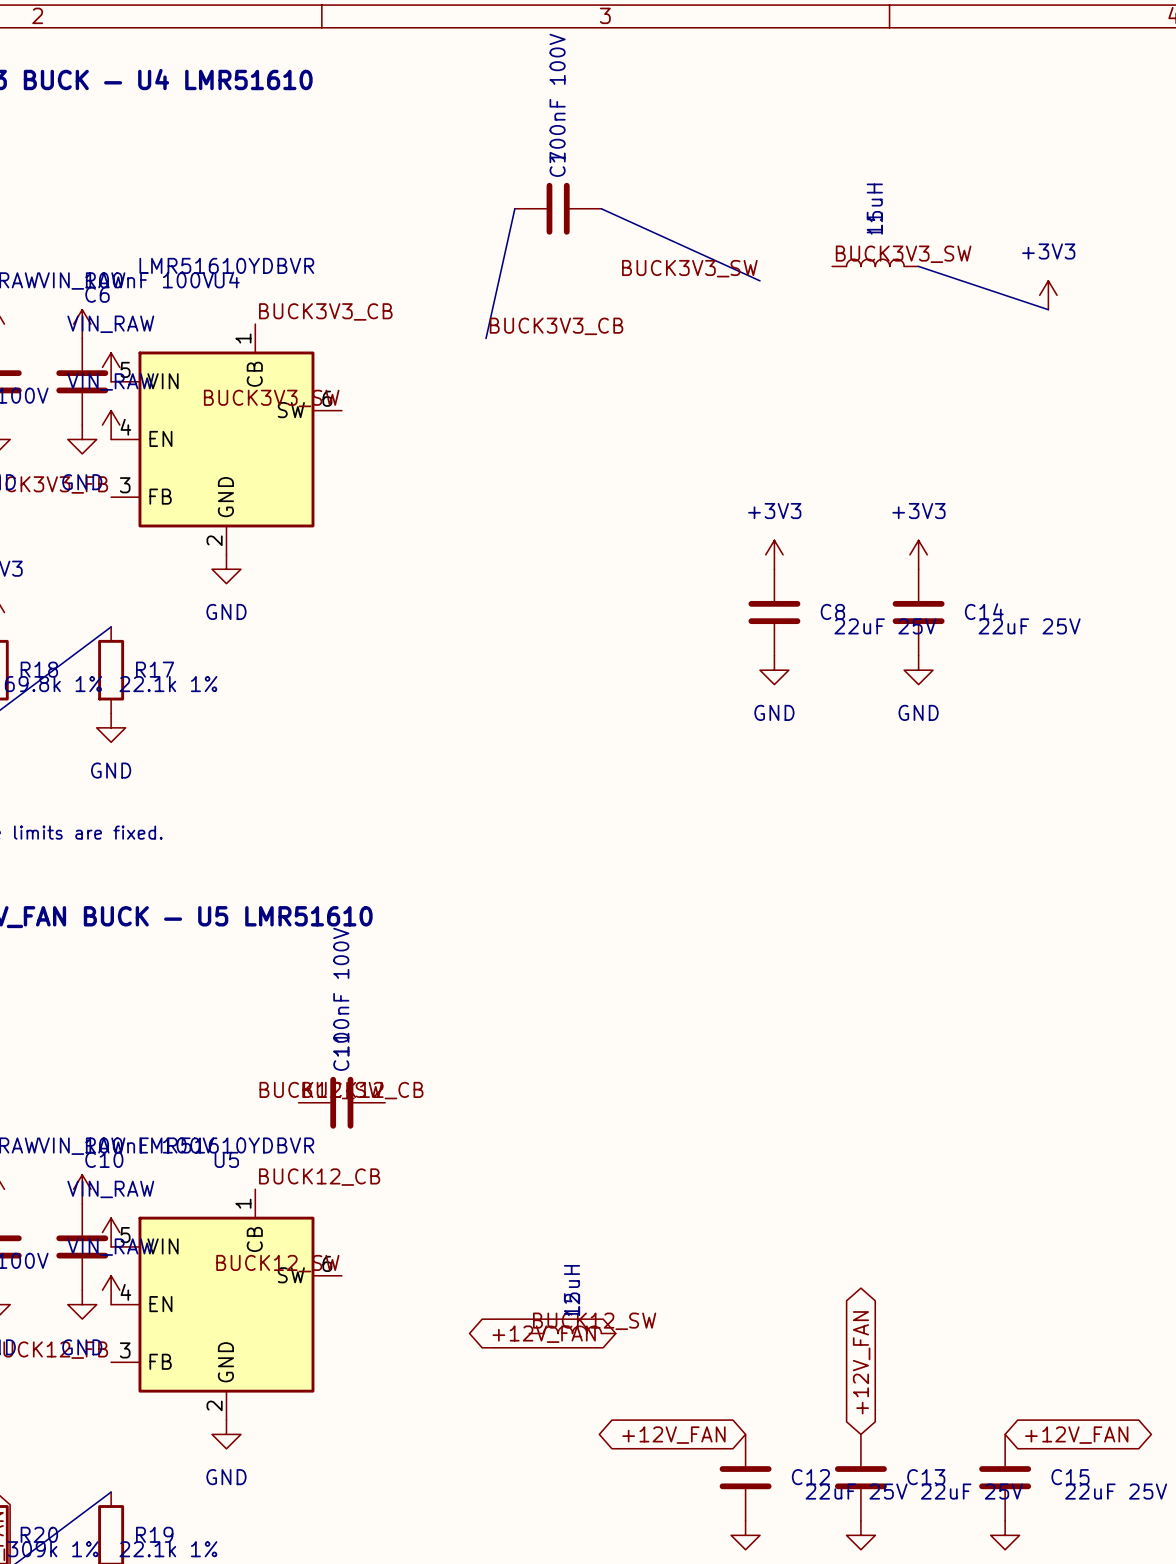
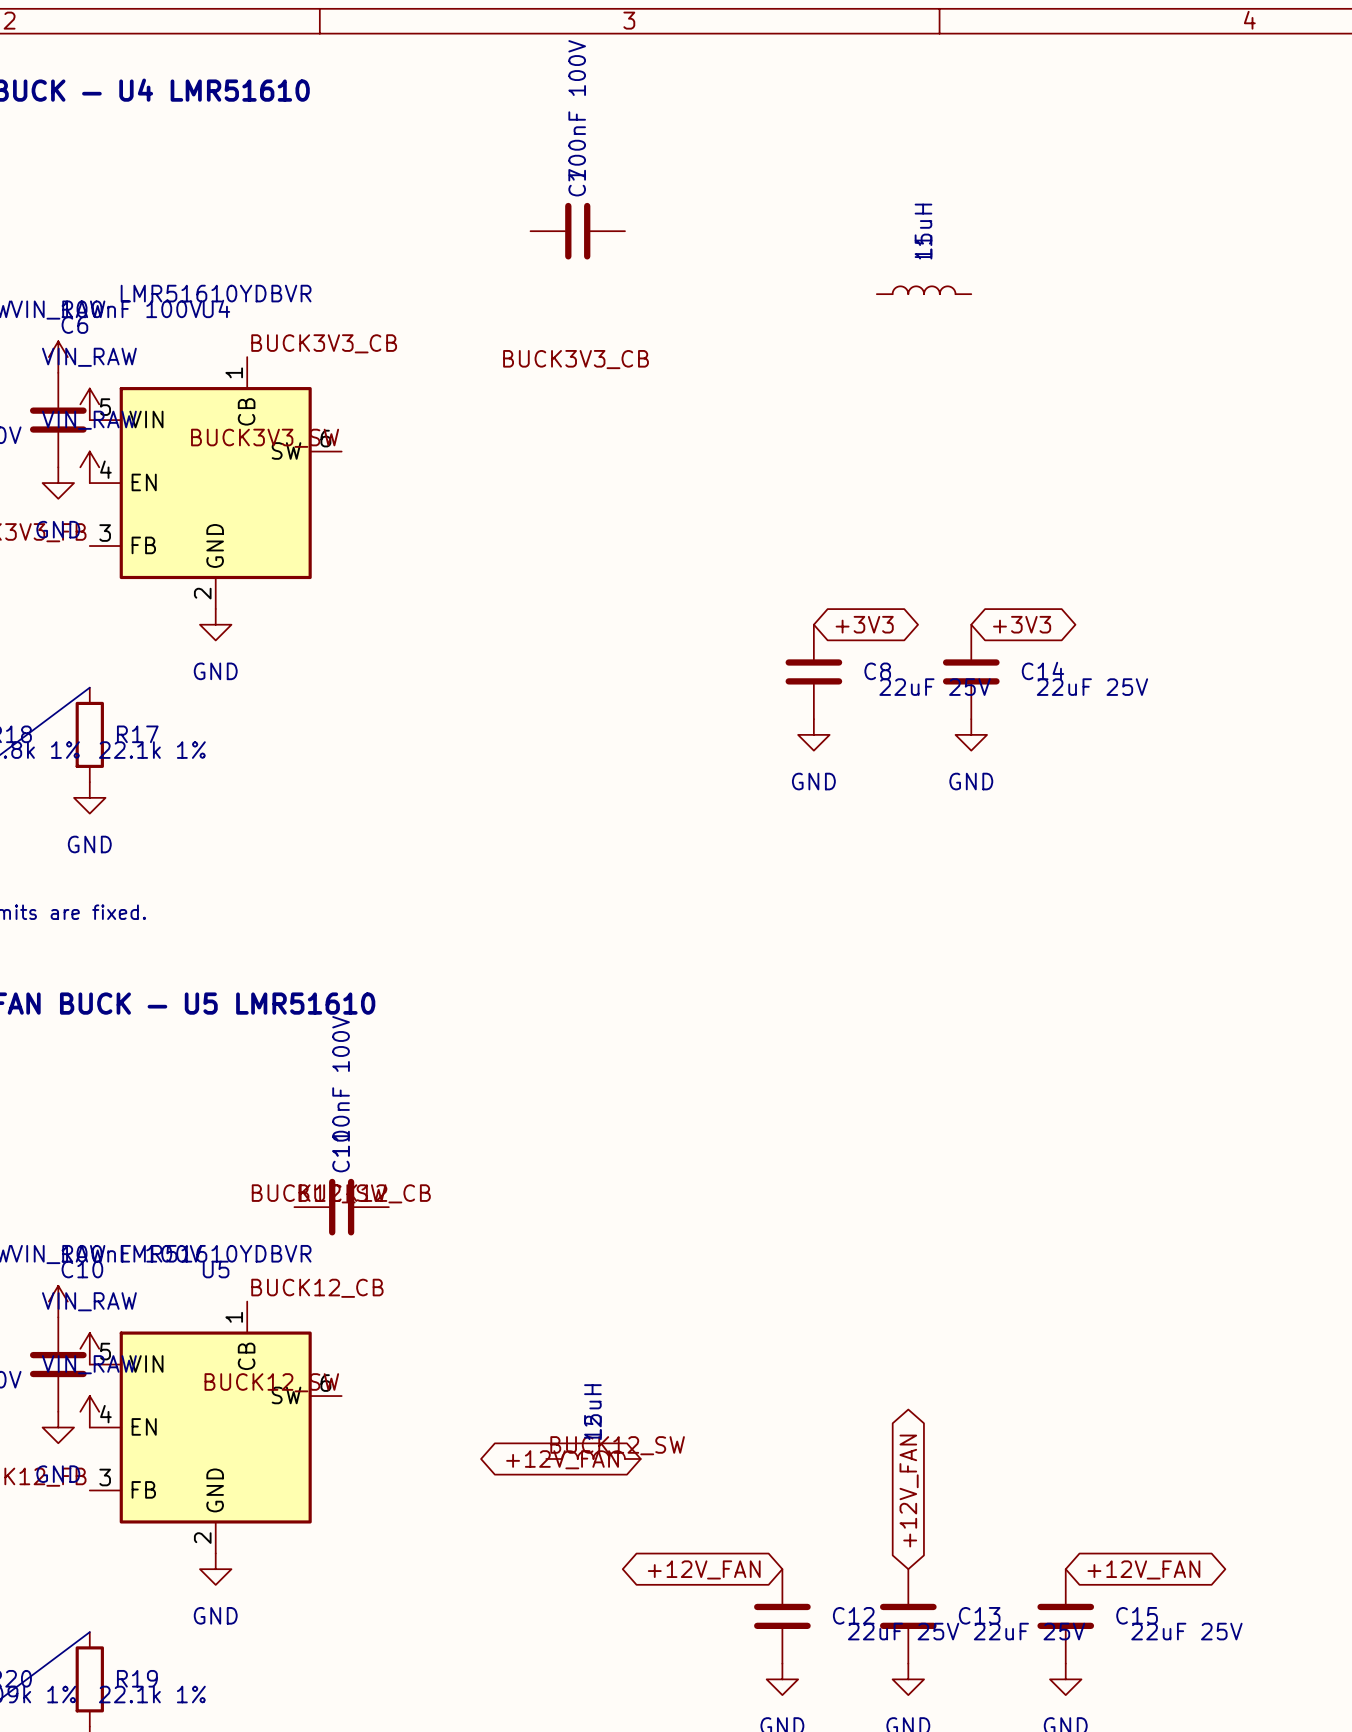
wire: (514, 208) (486, 338) -> none
wire: (601, 208) (759, 280) -> none
label: BUCK3V3_SW (903, 254) -> none
wire: (918, 266) (1048, 309) -> none
label: BUCK3V3_SW (689, 268) -> none
power symbol: +3V3 (1048, 295) -> none
power symbol: +3V3 (774, 554) -> none
power symbol: +3V3 (918, 554) -> none
global label: none -> +3V3 (864, 624)
global label: none -> +3V3 (1022, 624)

